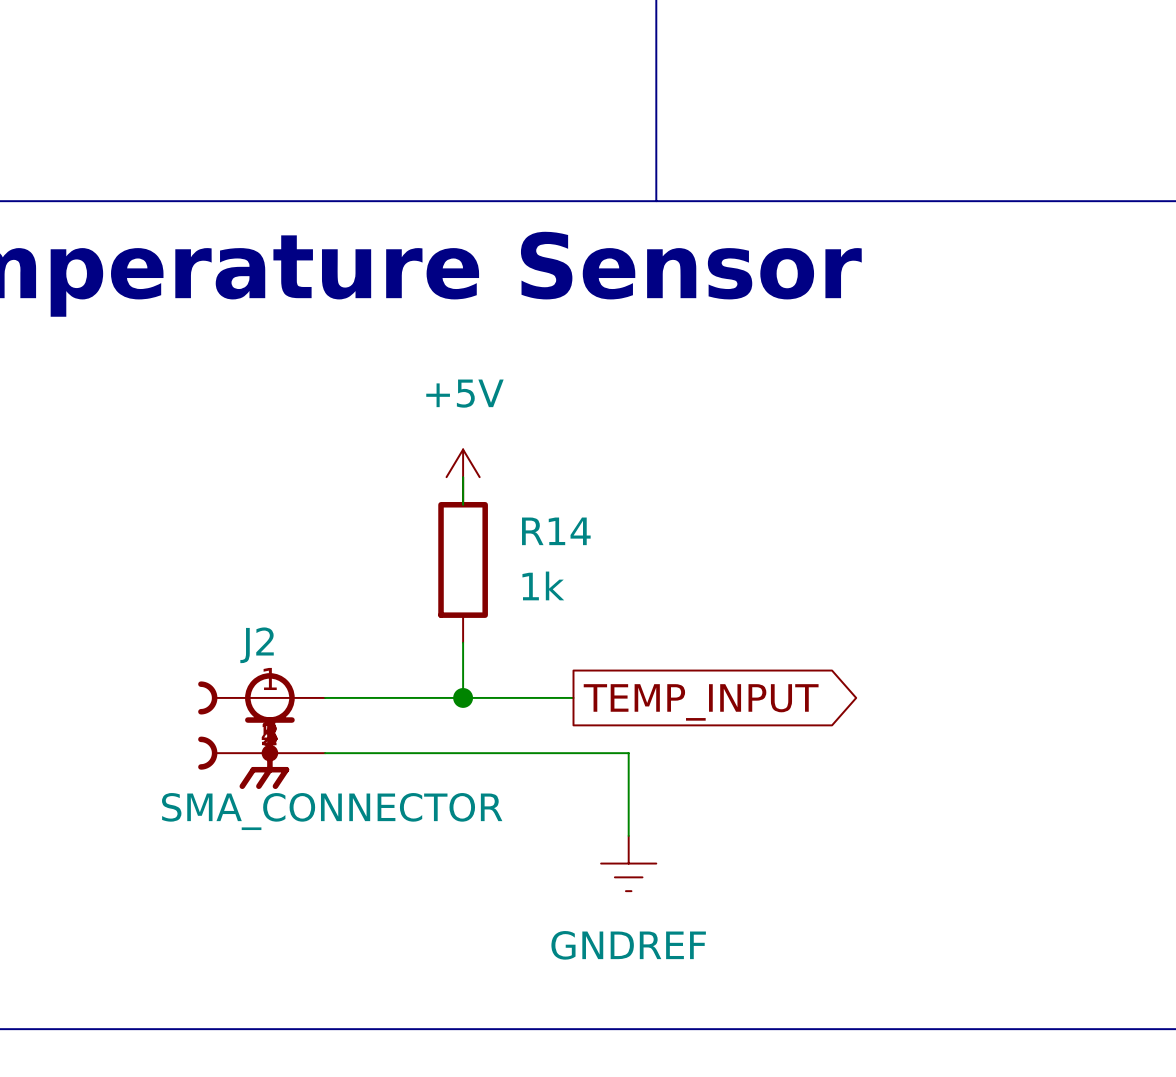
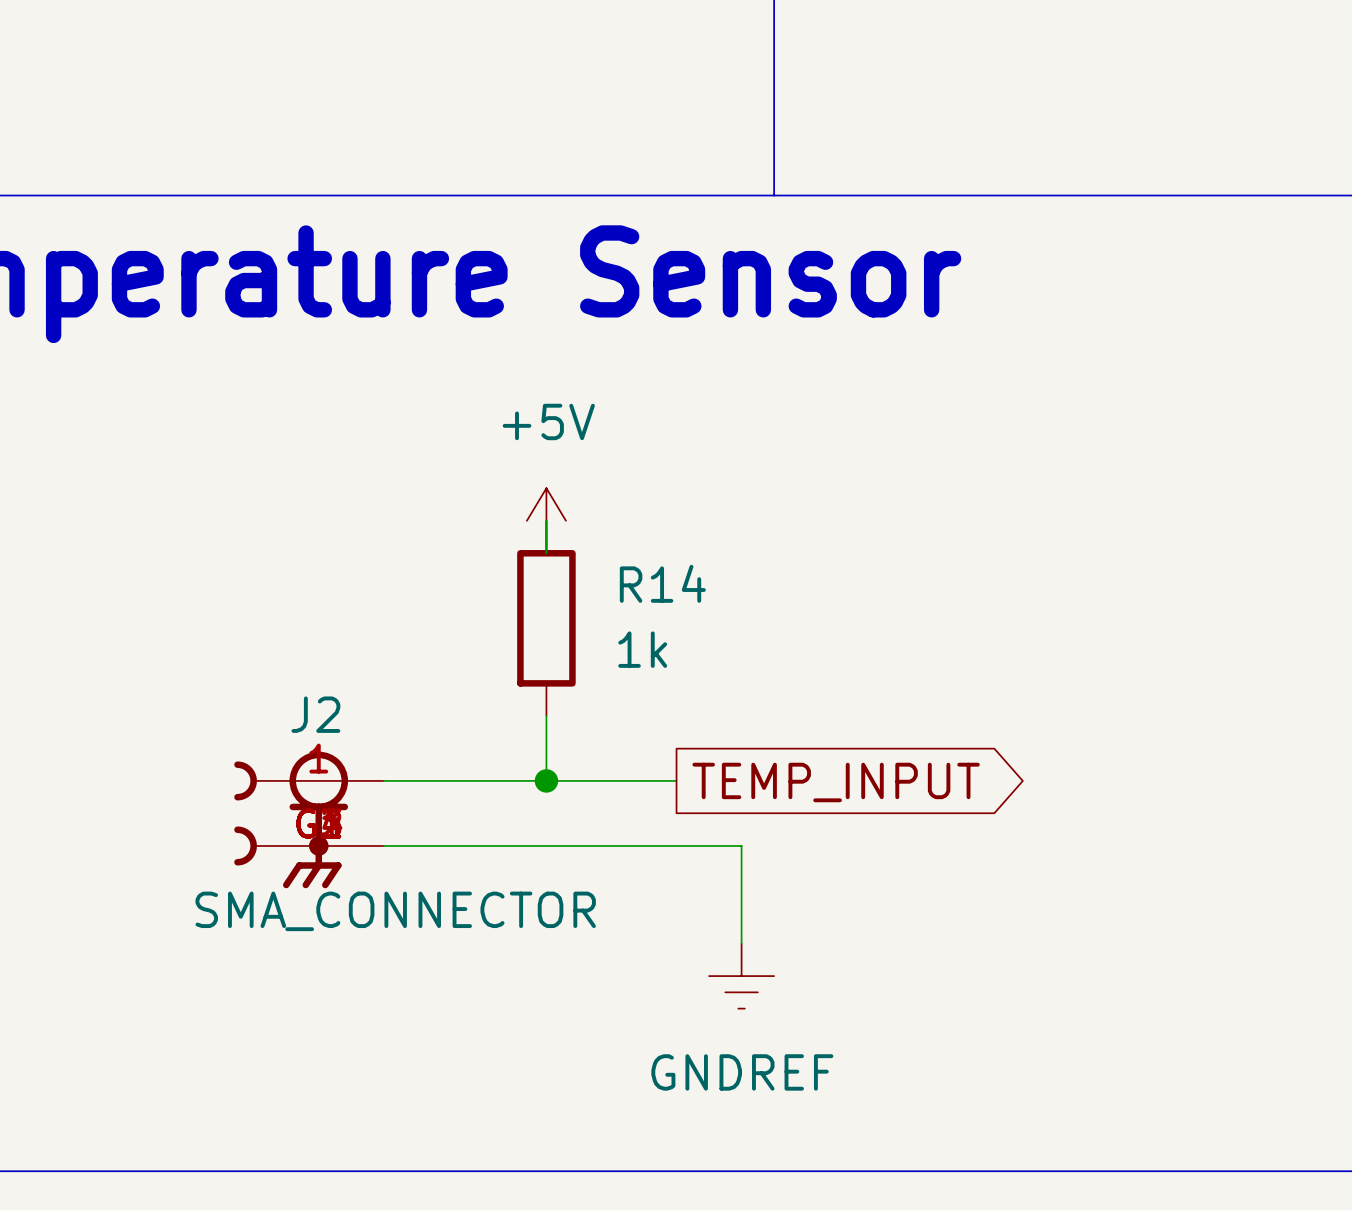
J2 symbol: [198, 673, 326, 790] -> [234, 751, 384, 889]

